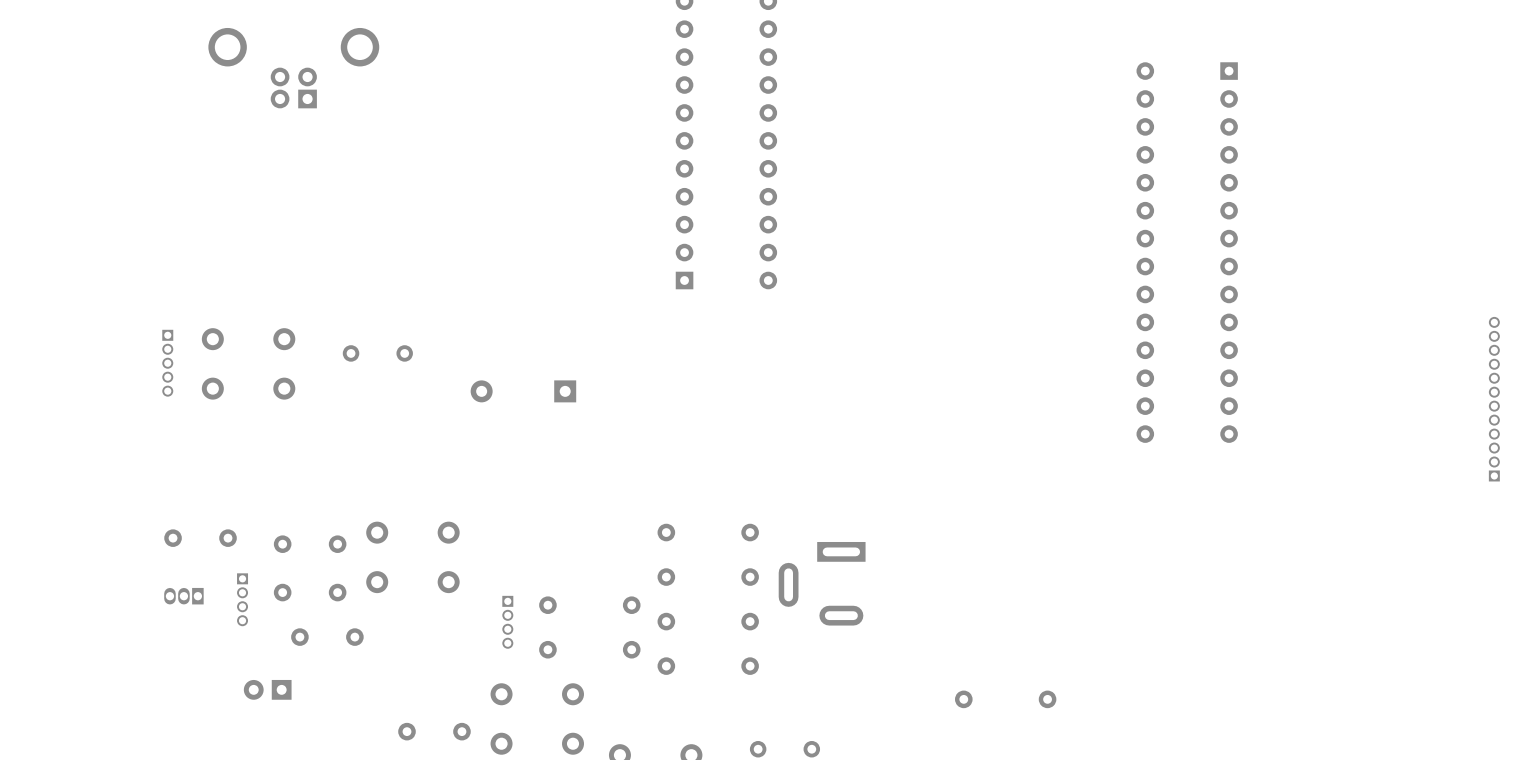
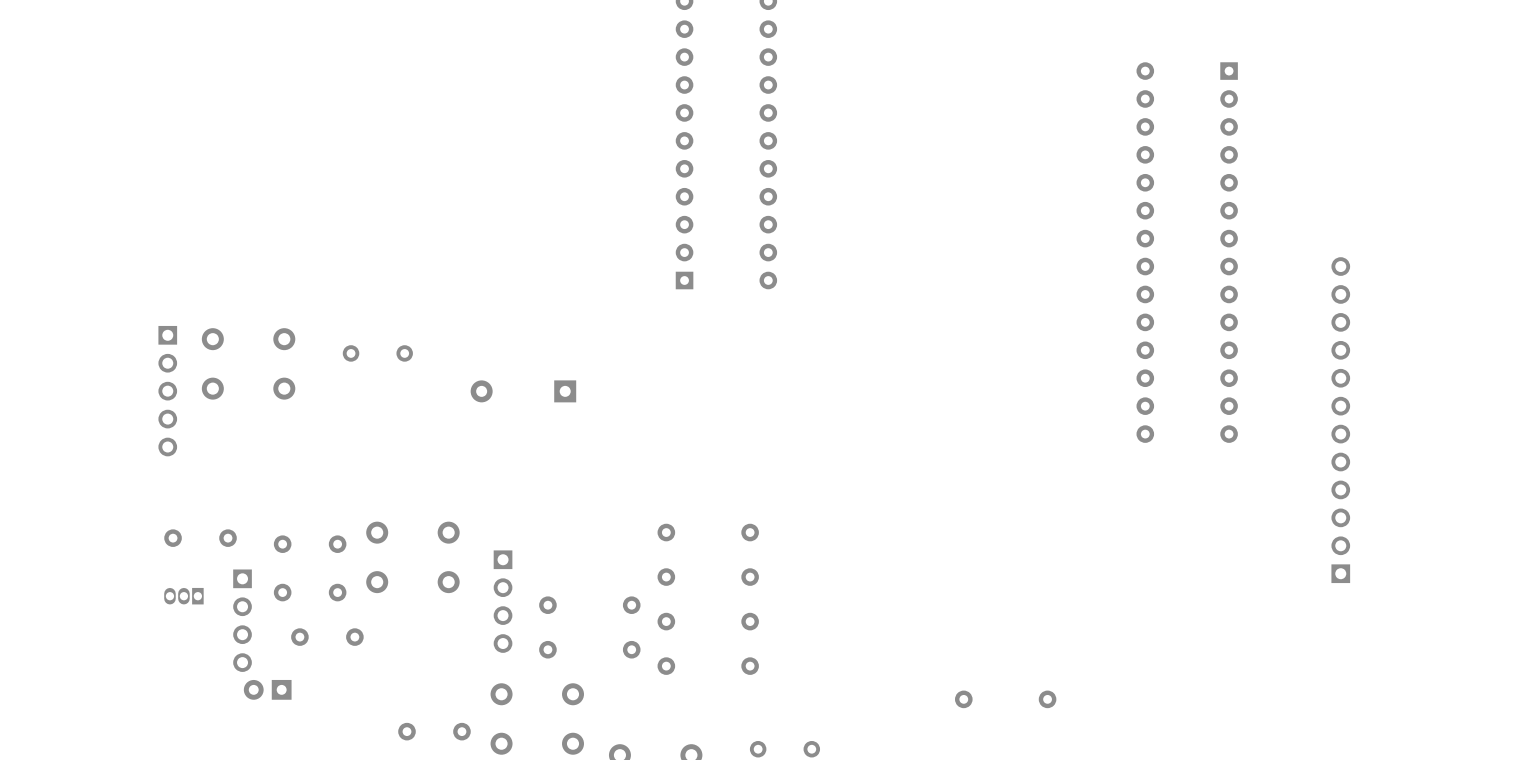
part: (293, 68) -> none
part: (167, 363) -> none
part: none -> (167, 391)
part: (1494, 399) -> none
part: none -> (1340, 420)
part: (822, 583) -> none
part: (242, 599) -> none
part: none -> (503, 601)
part: none -> (242, 620)
part: (507, 622) -> none

